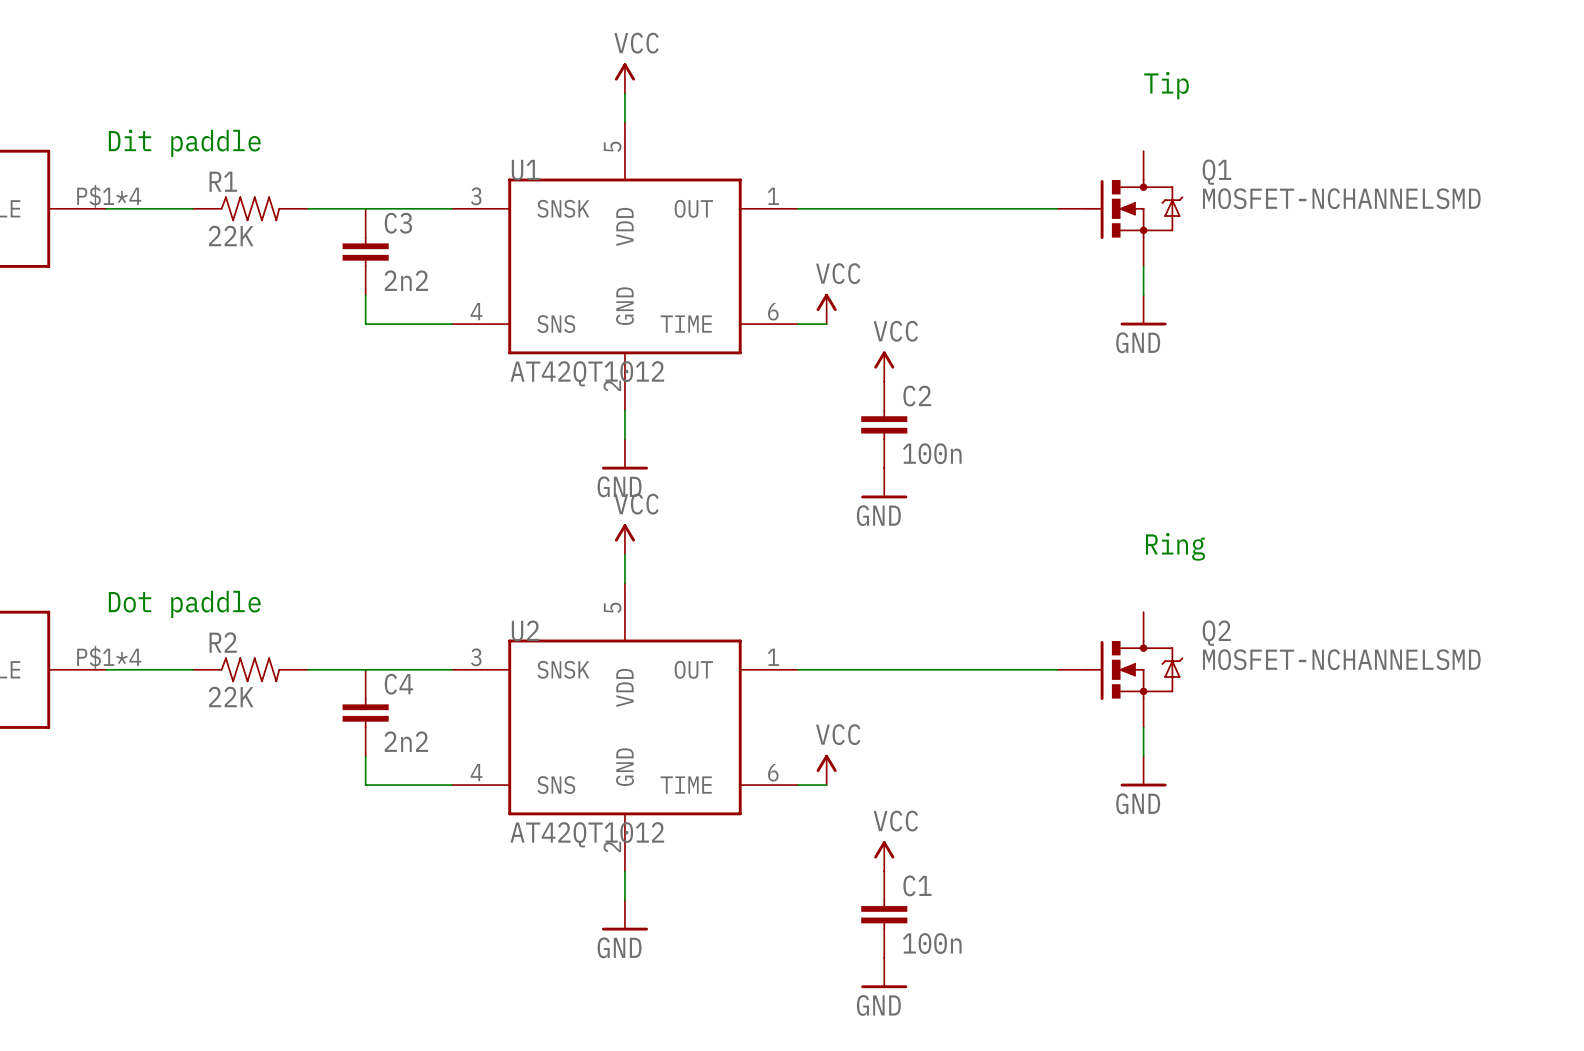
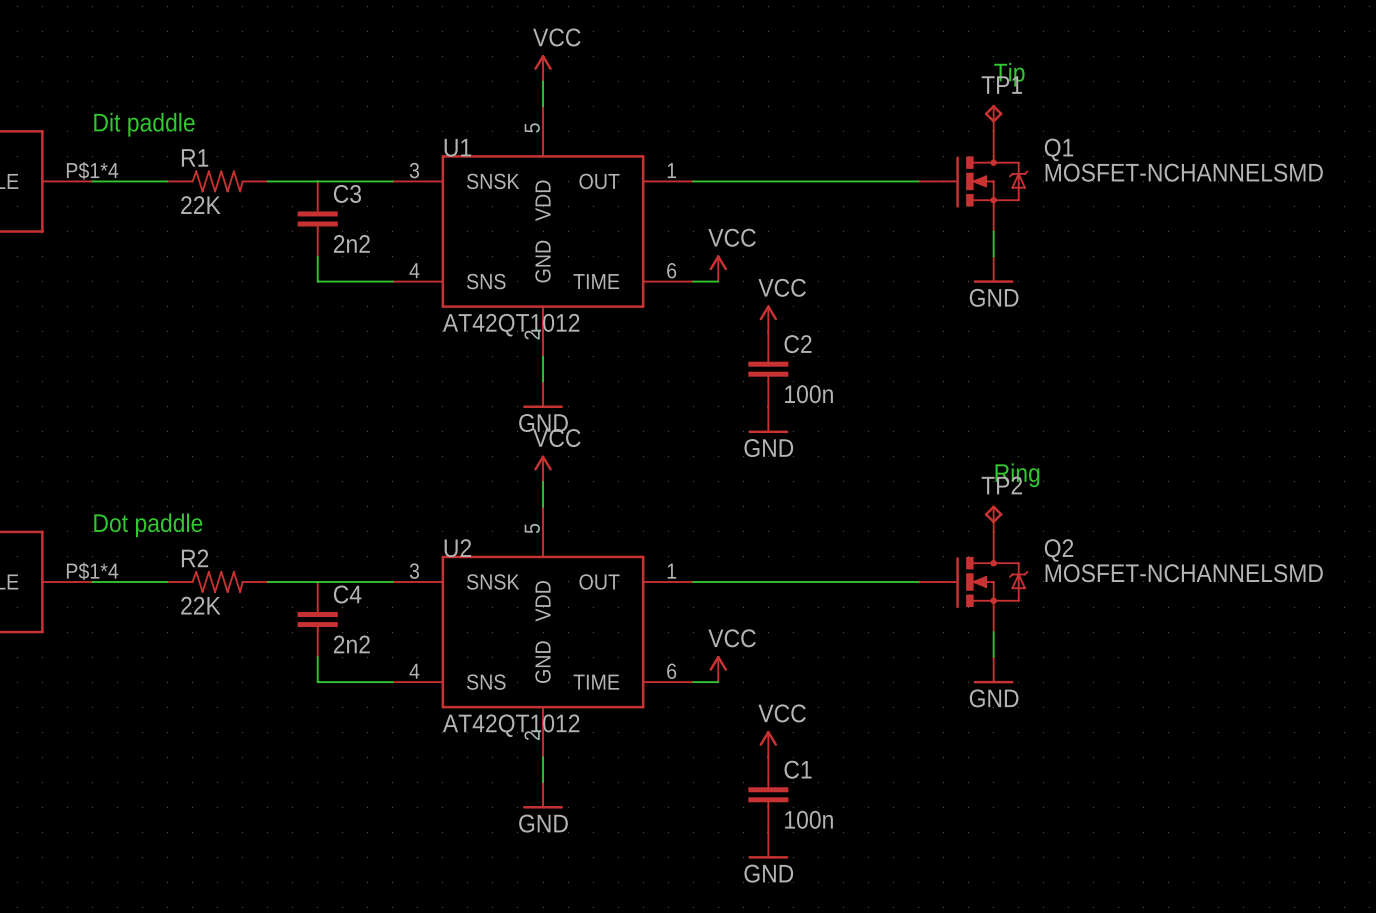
TP1: none -> (993, 118)
TP2: none -> (993, 518)

